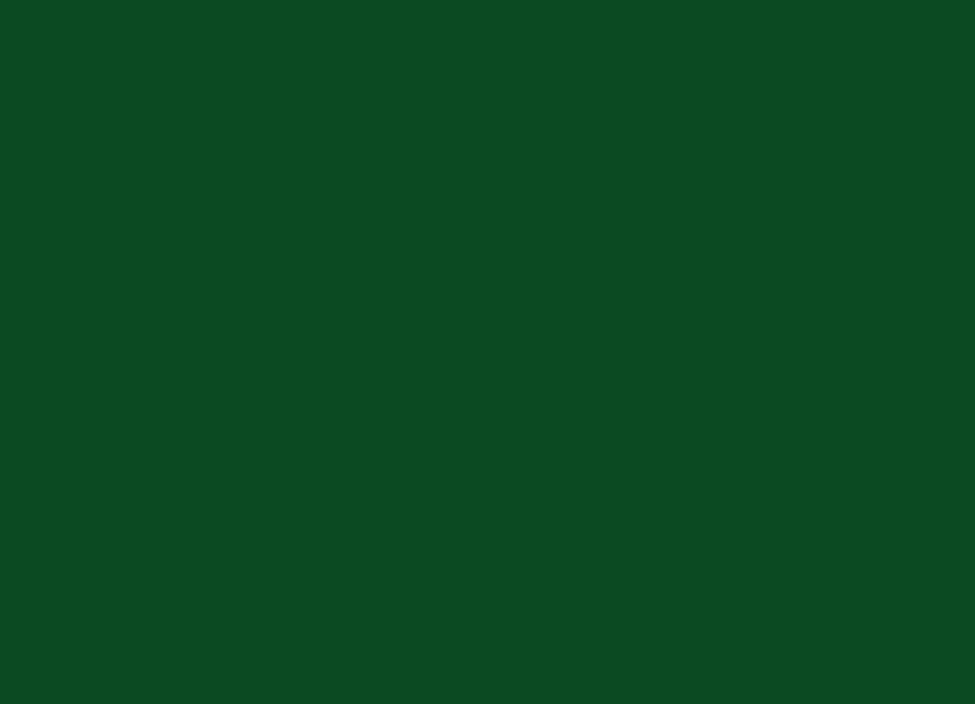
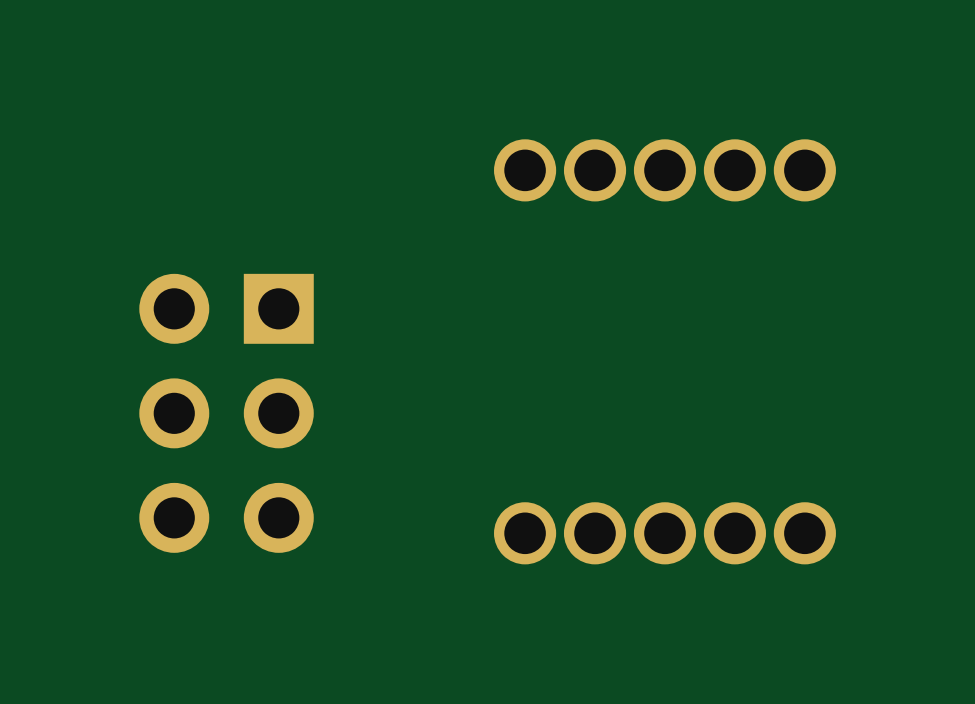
part: none -> (664, 170)
part: none -> (226, 413)
part: none -> (664, 533)

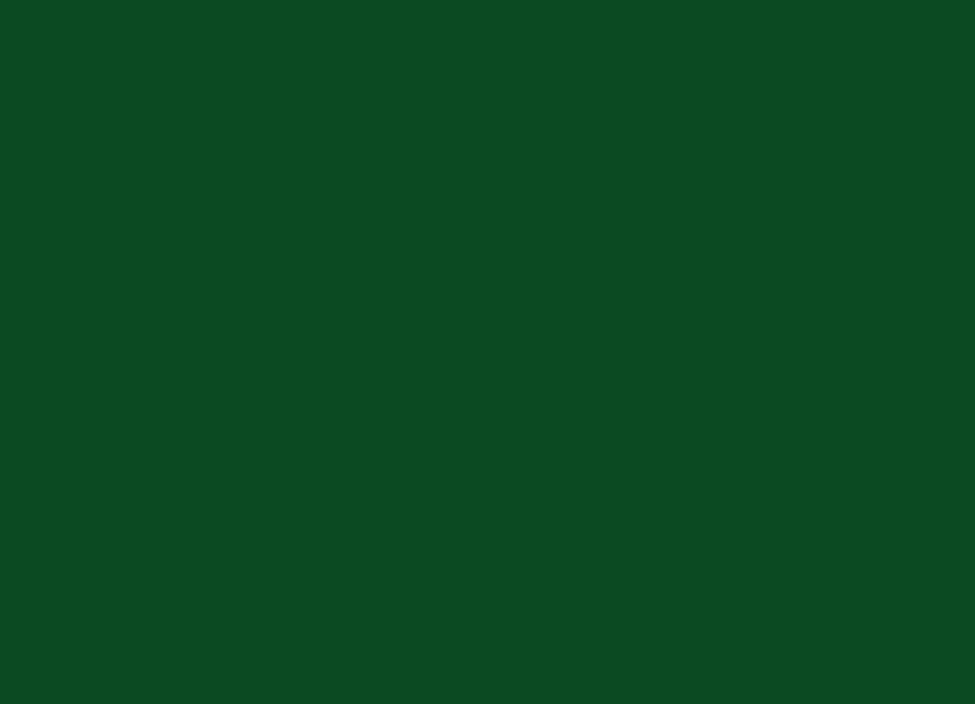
part: (664, 170) -> none
part: (226, 413) -> none
part: (664, 533) -> none

